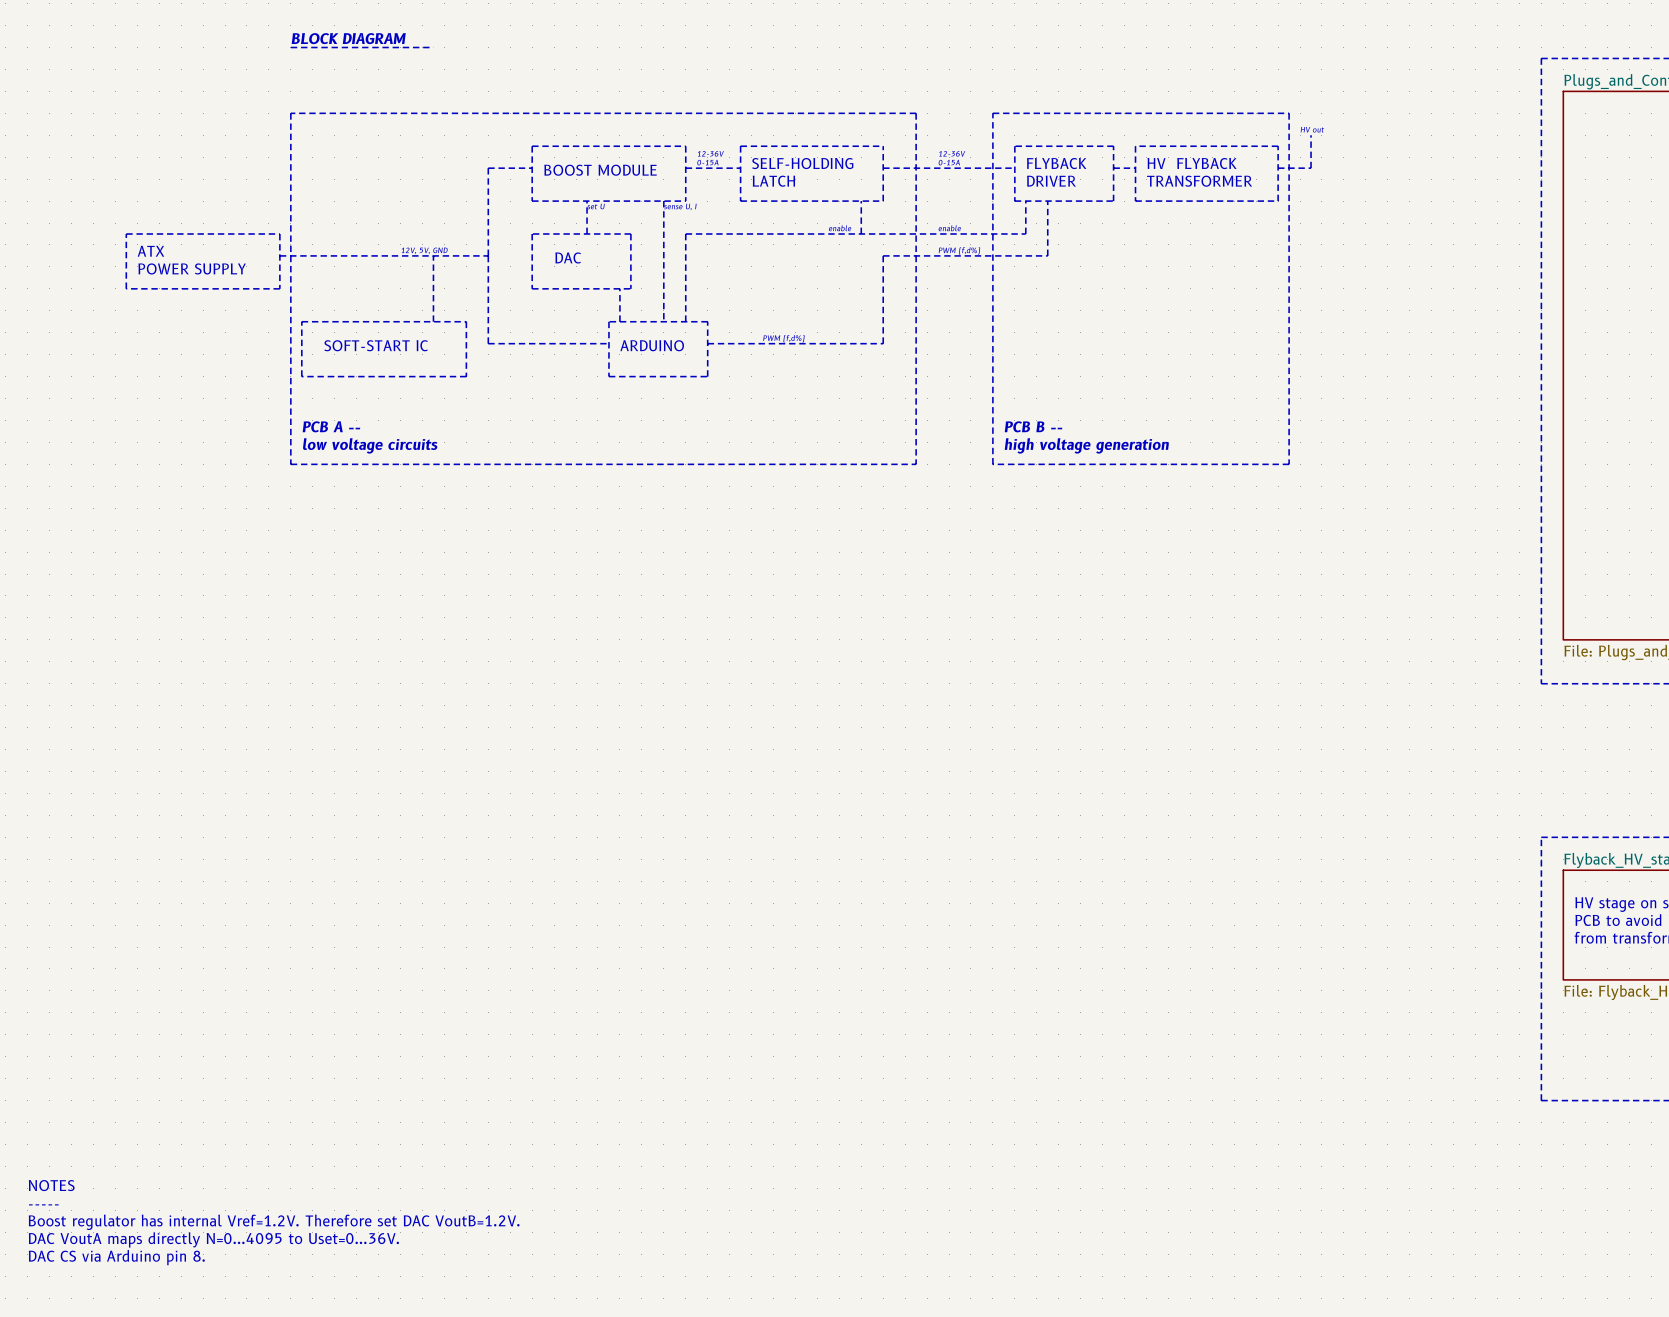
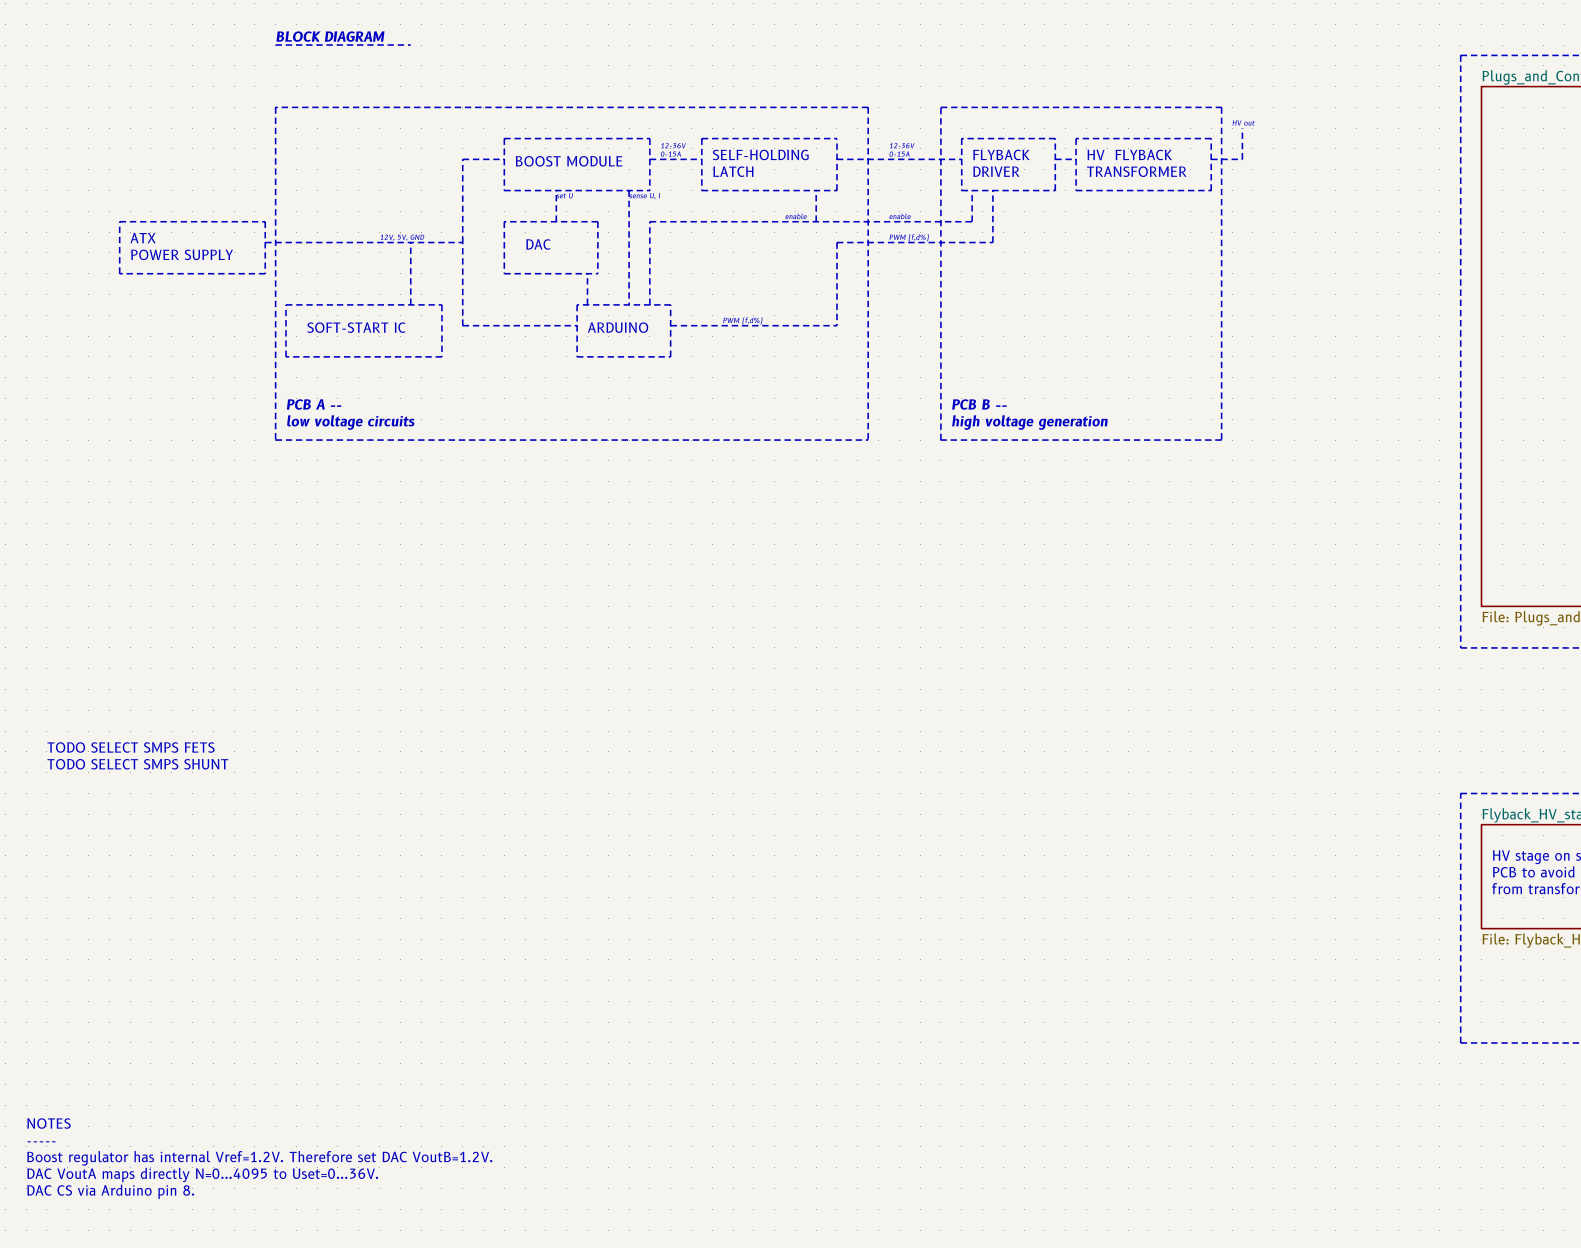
text: none -> TODO SELECT SMPS FETS (131, 747)
text: none -> TODO SELECT SMPS SHUNT (137, 764)

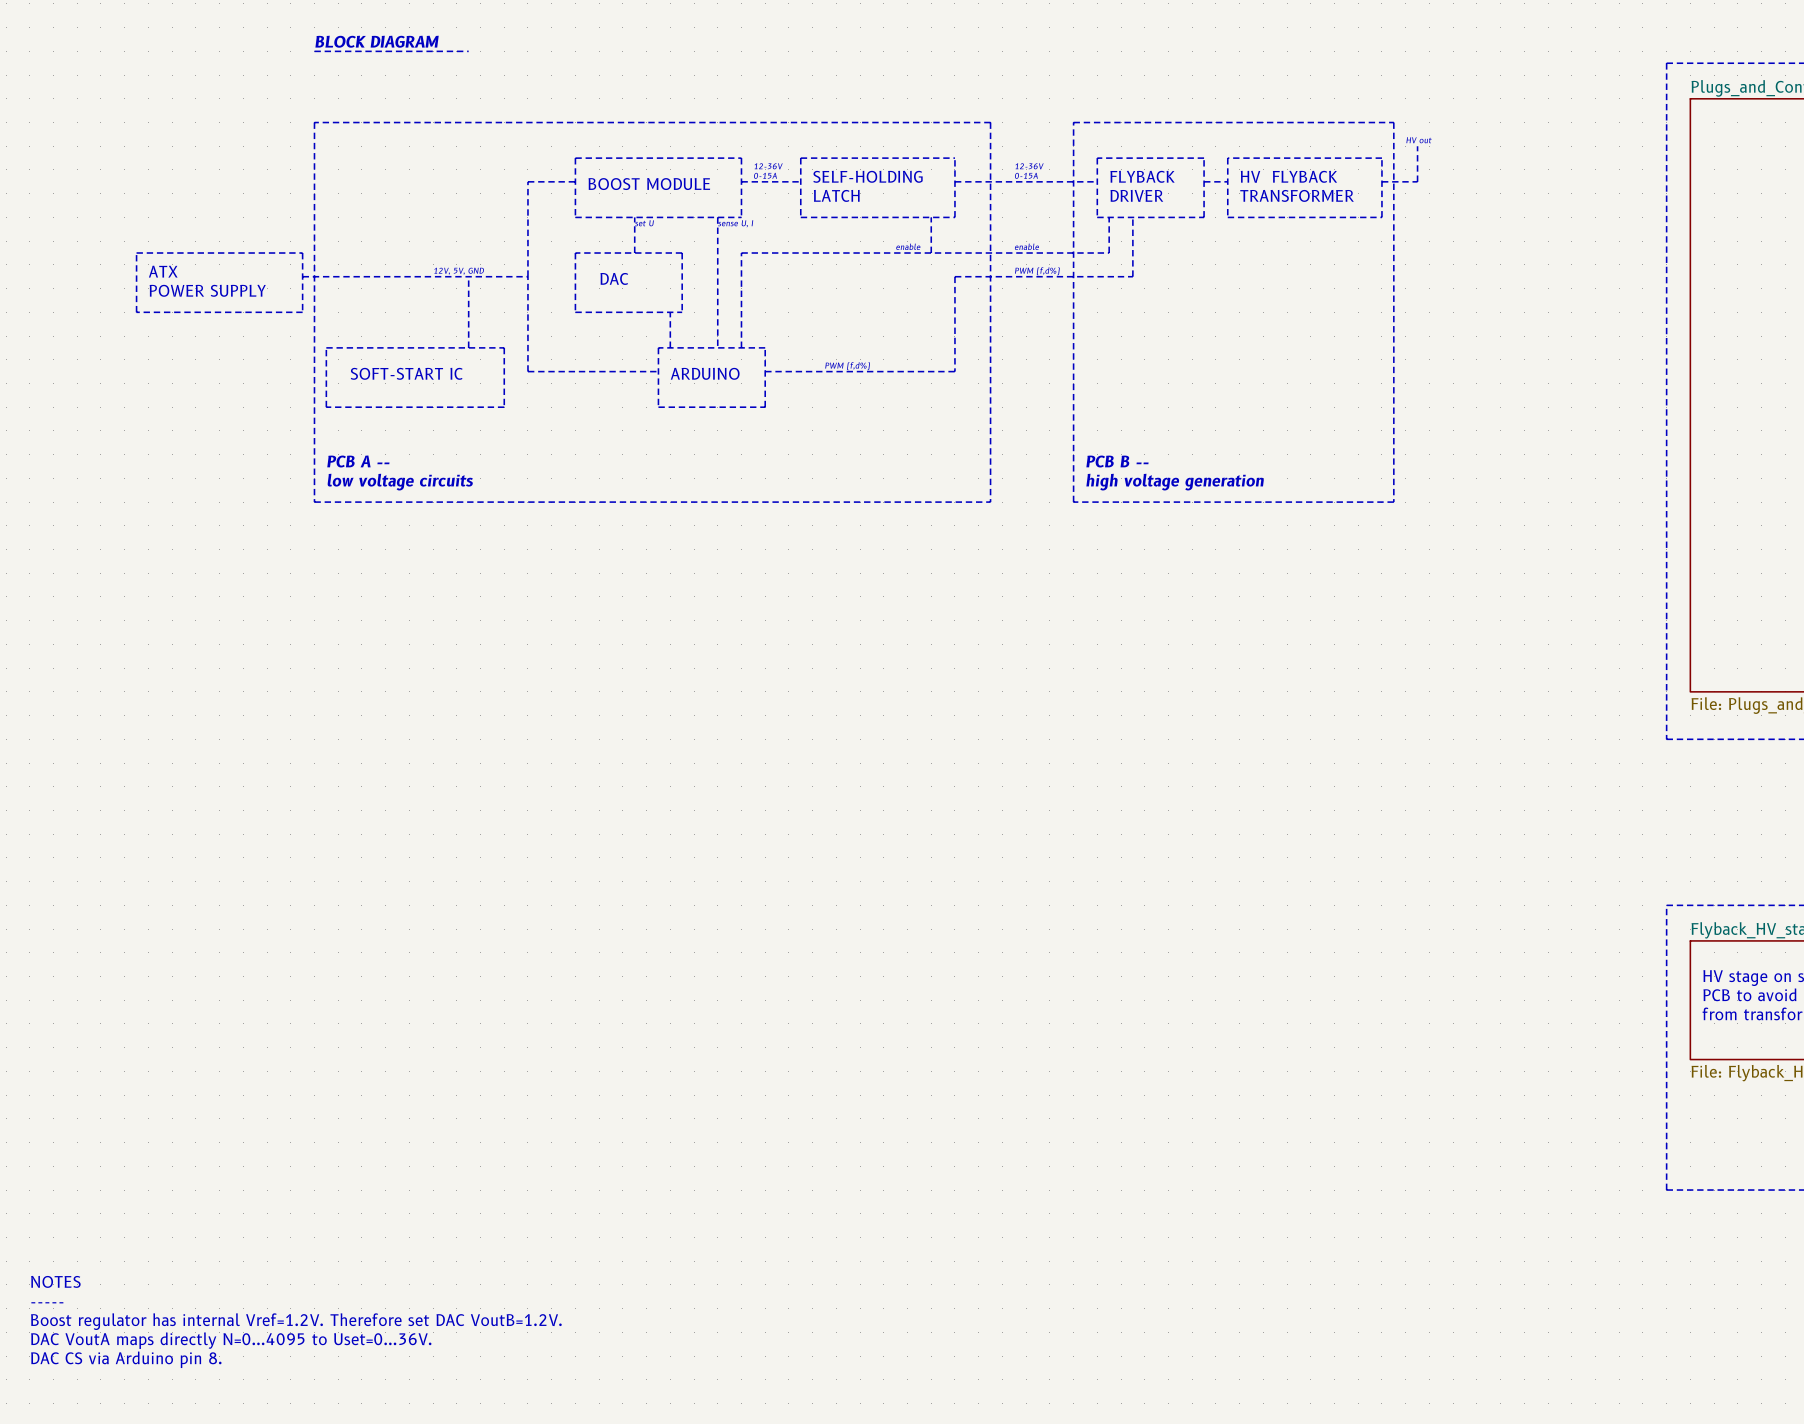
text: TODO SELECT SMPS FETS (131, 747) -> none
text: TODO SELECT SMPS SHUNT (137, 764) -> none

